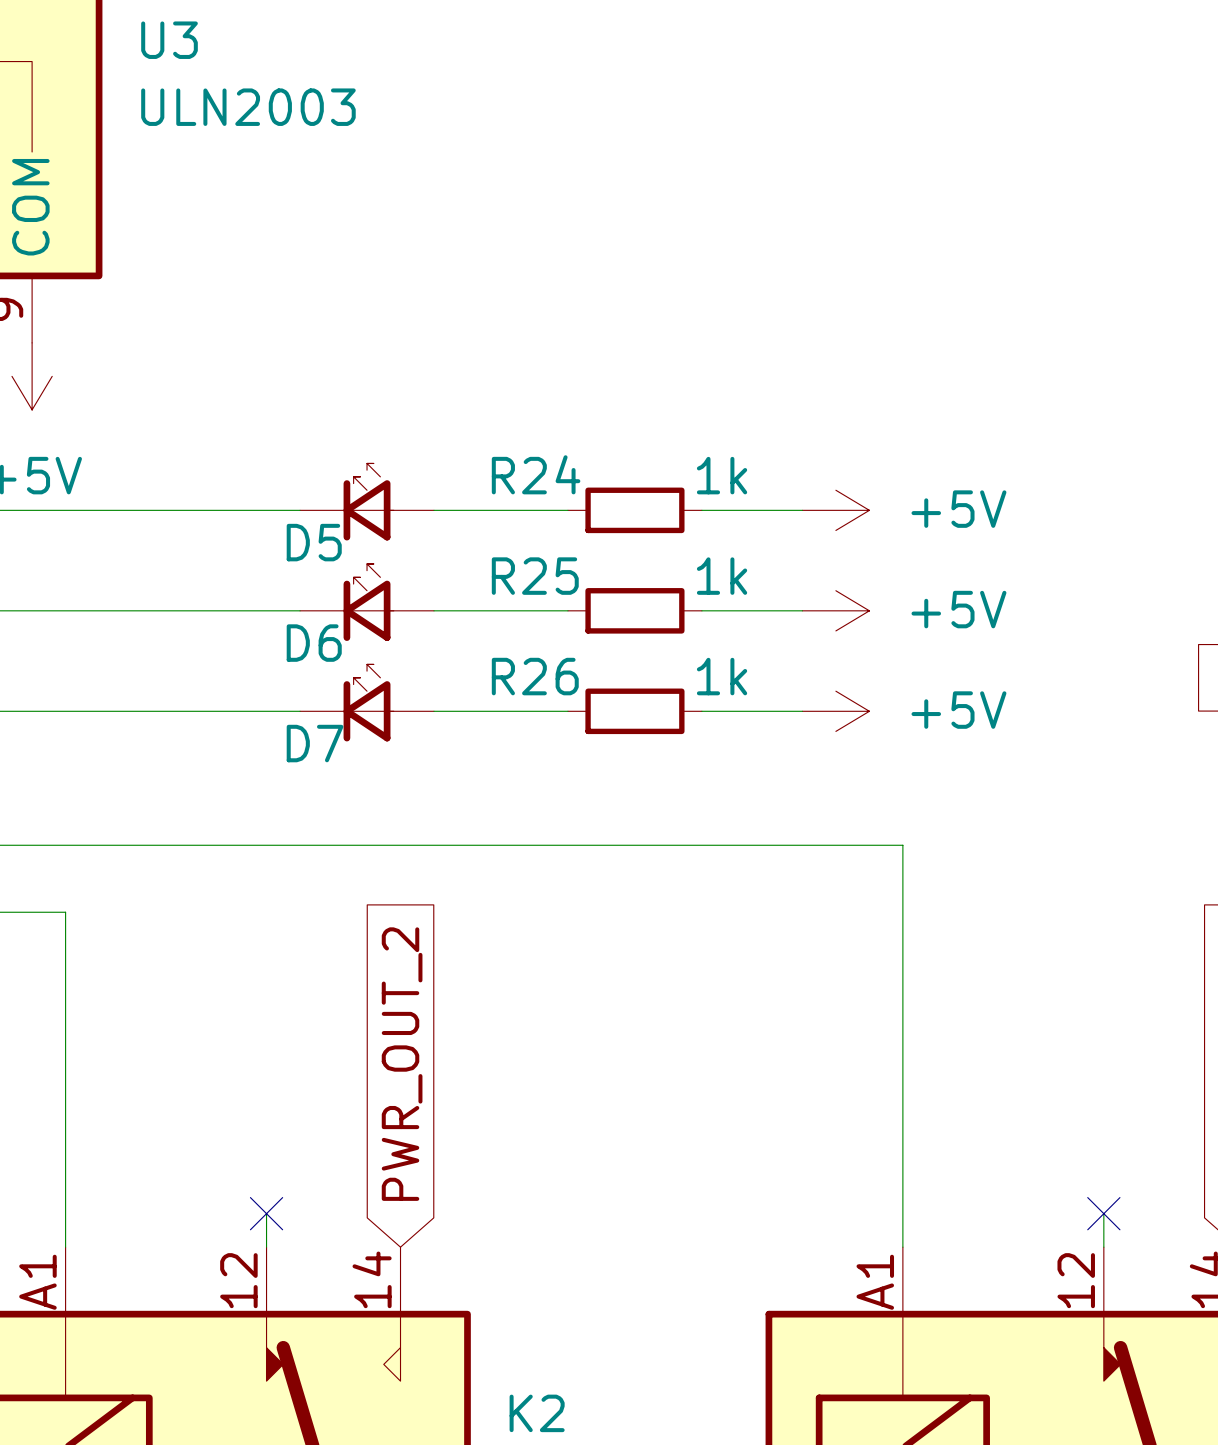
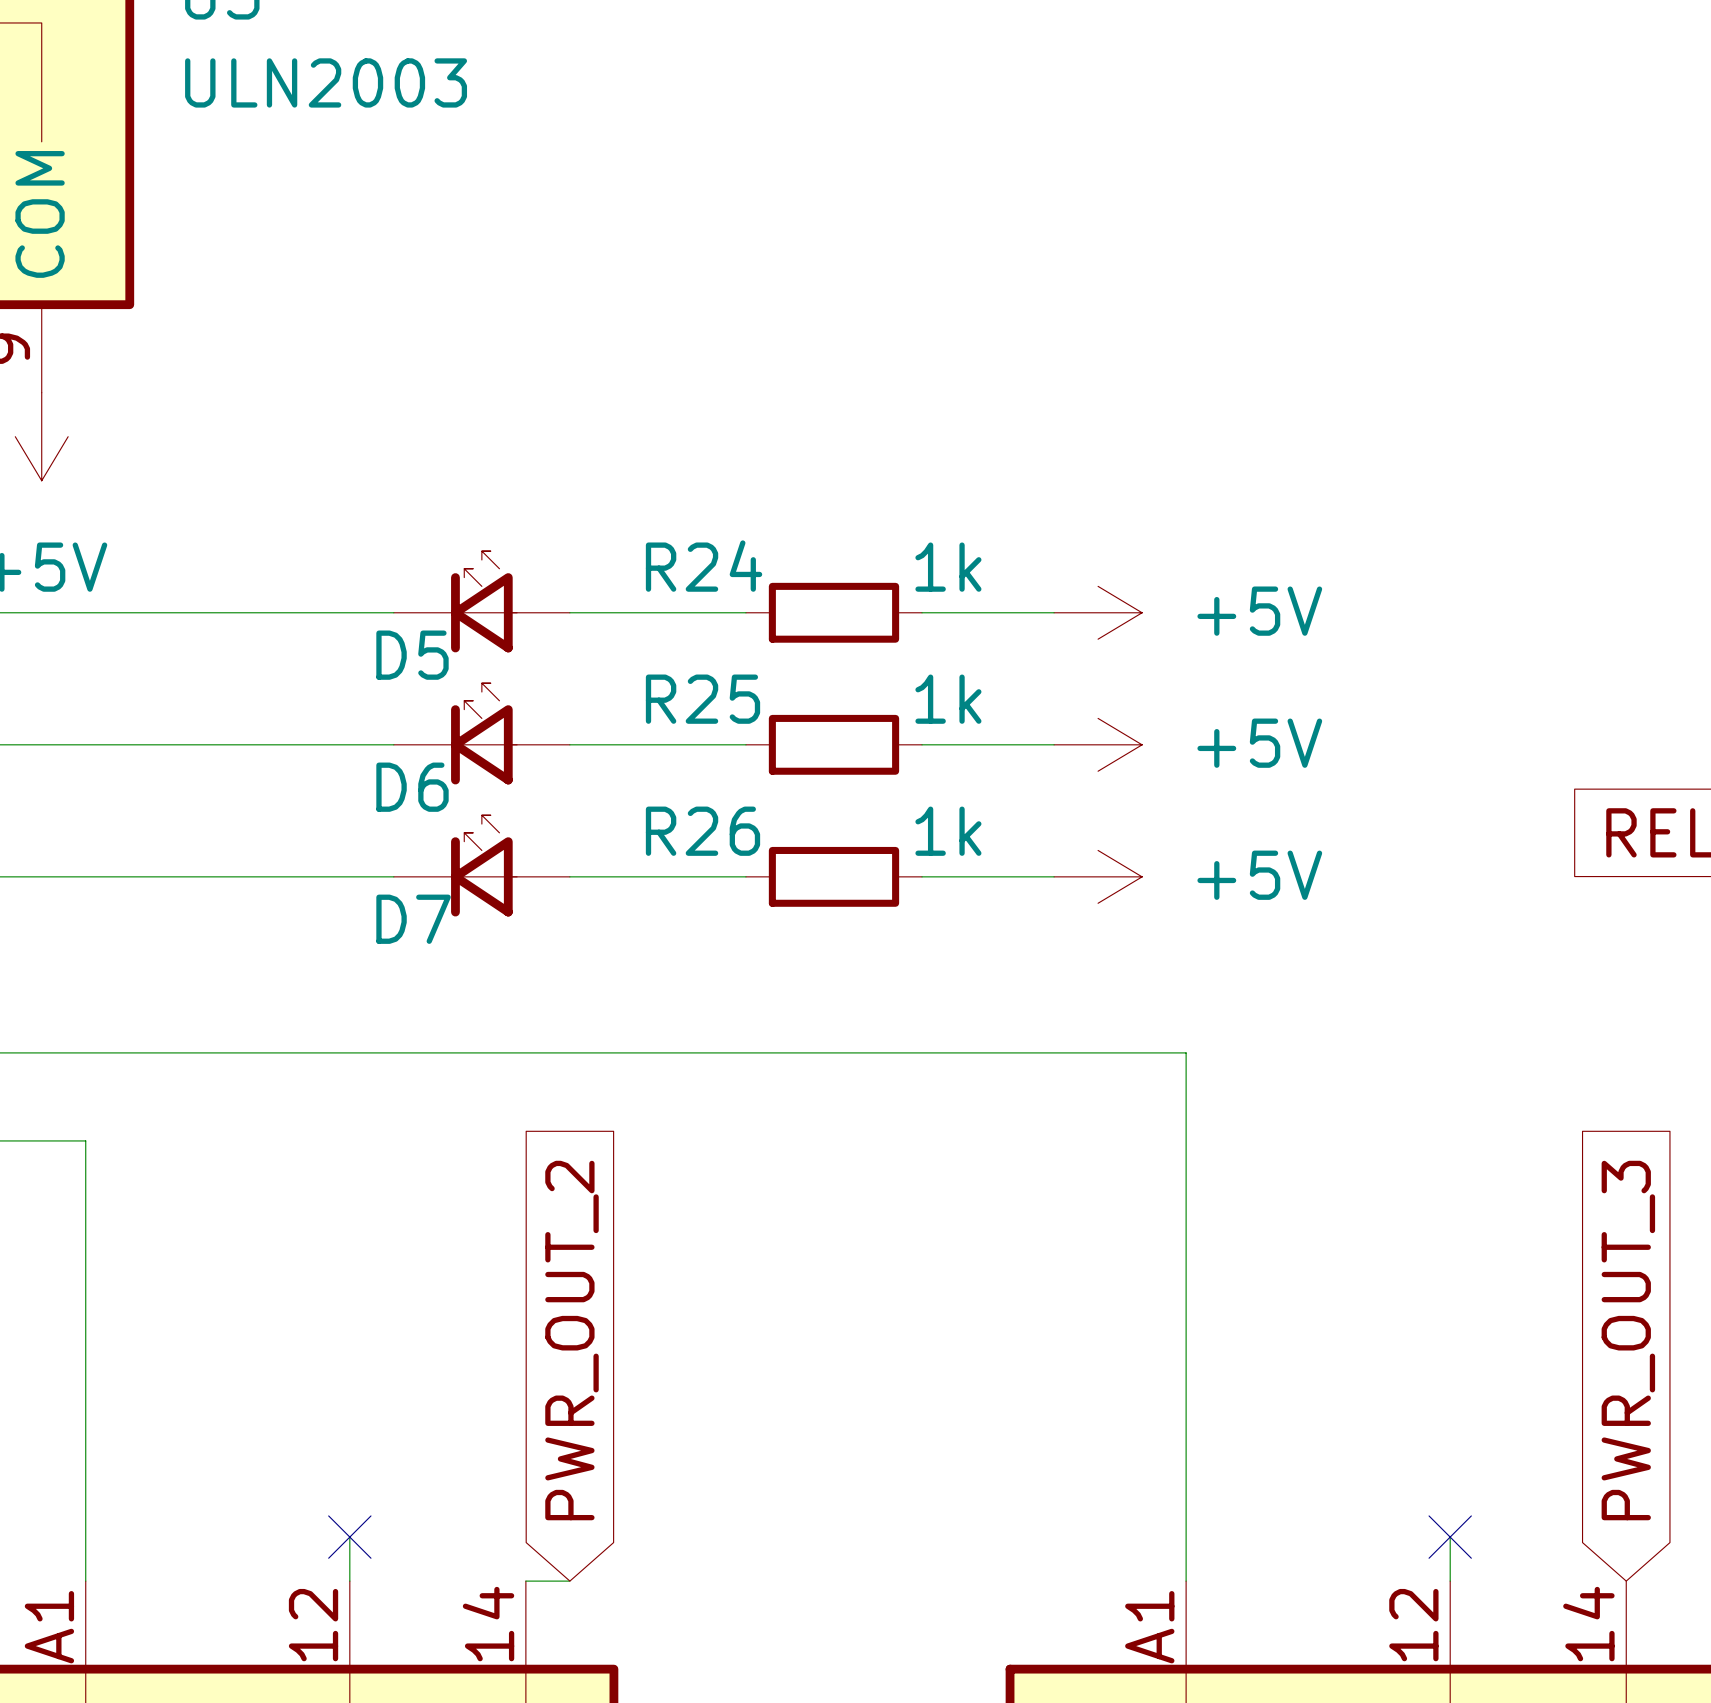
global label position: PWR_OUT_2 (402, 1064) -> PWR_OUT_2 (572, 1340)
wire: none -> (525, 1581) (569, 1581)

